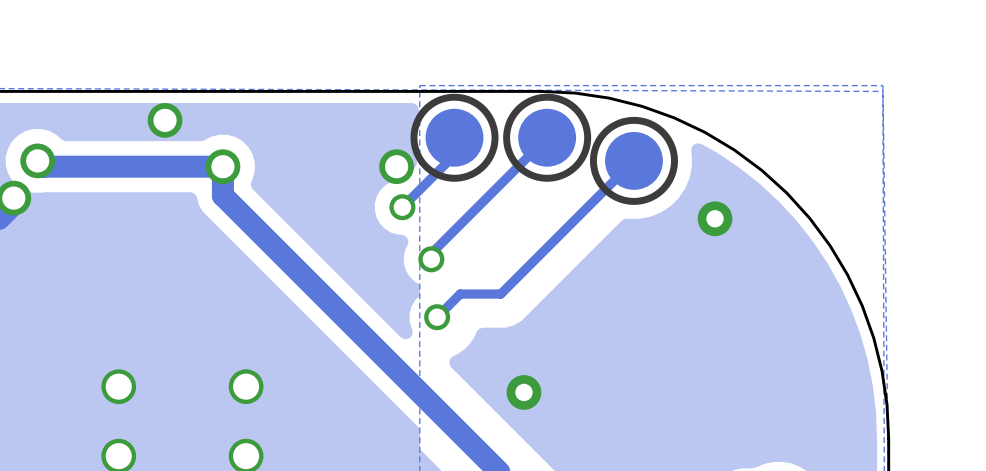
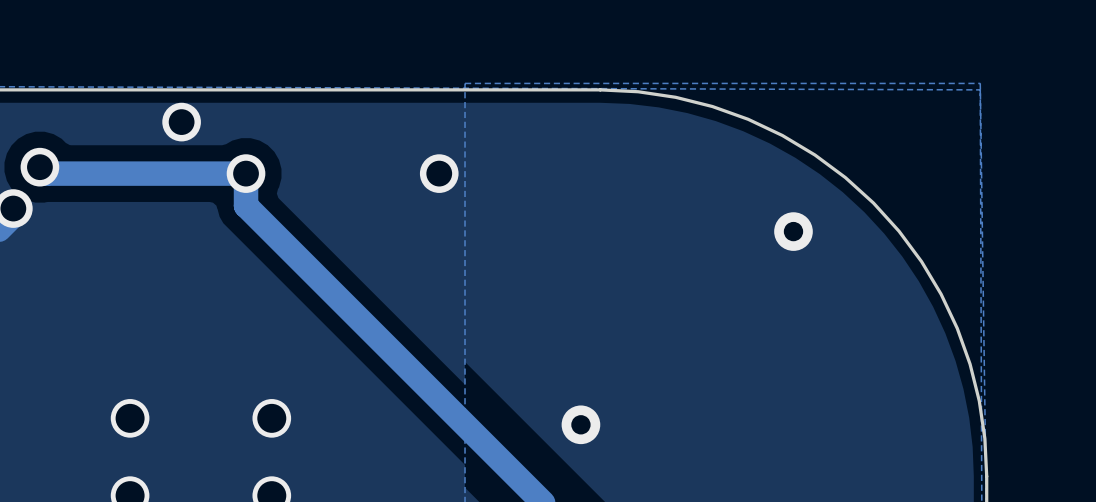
track: (454, 137) (454, 155) (402, 207) -> none
part: (454, 137) -> none
track: (547, 137) (431, 253) (431, 259) -> none
part: (547, 137) -> none
track: (633, 160) (500, 294) (460, 294) (437, 317) -> none
part: (633, 160) -> none
via: (402, 207) -> none
via: (431, 259) -> none
via: (437, 317) -> none

